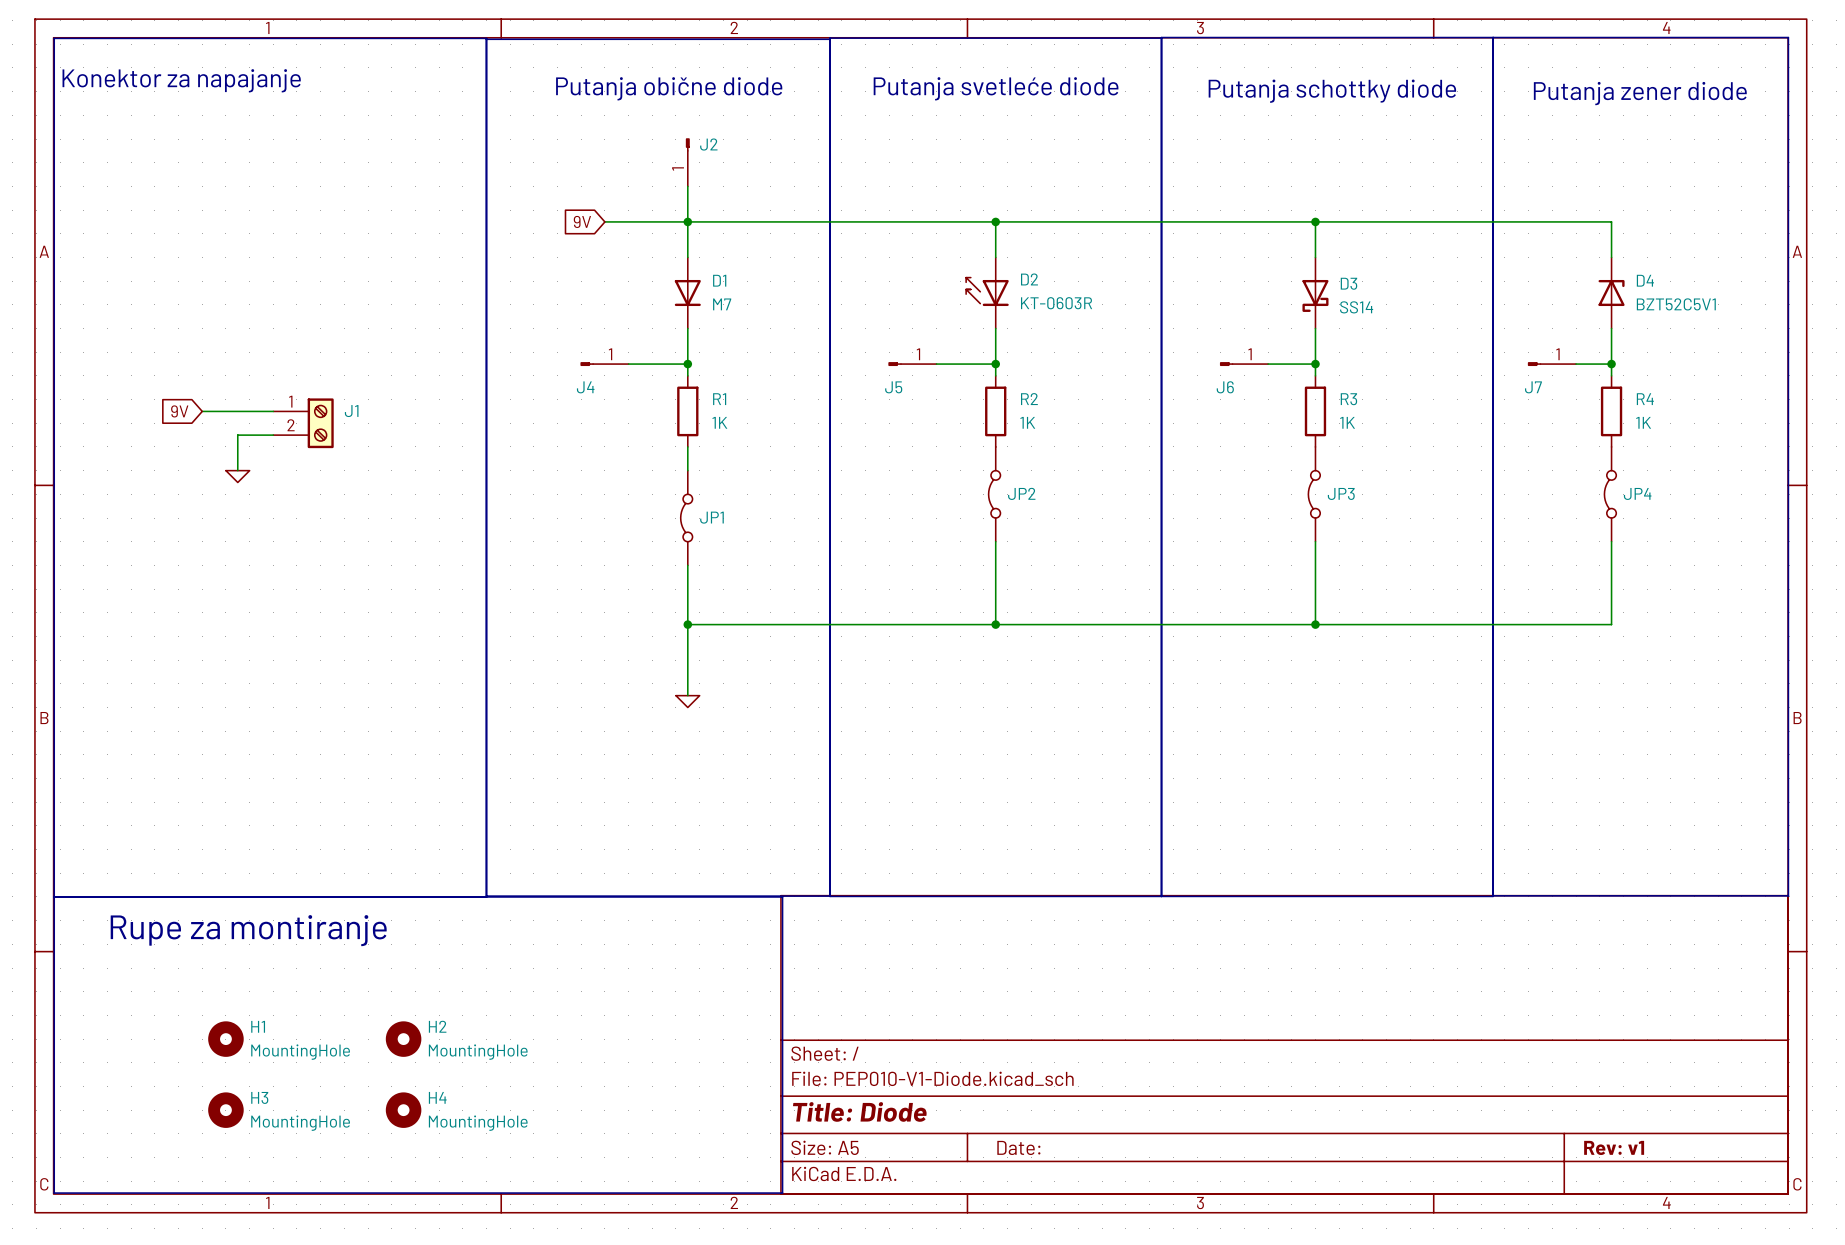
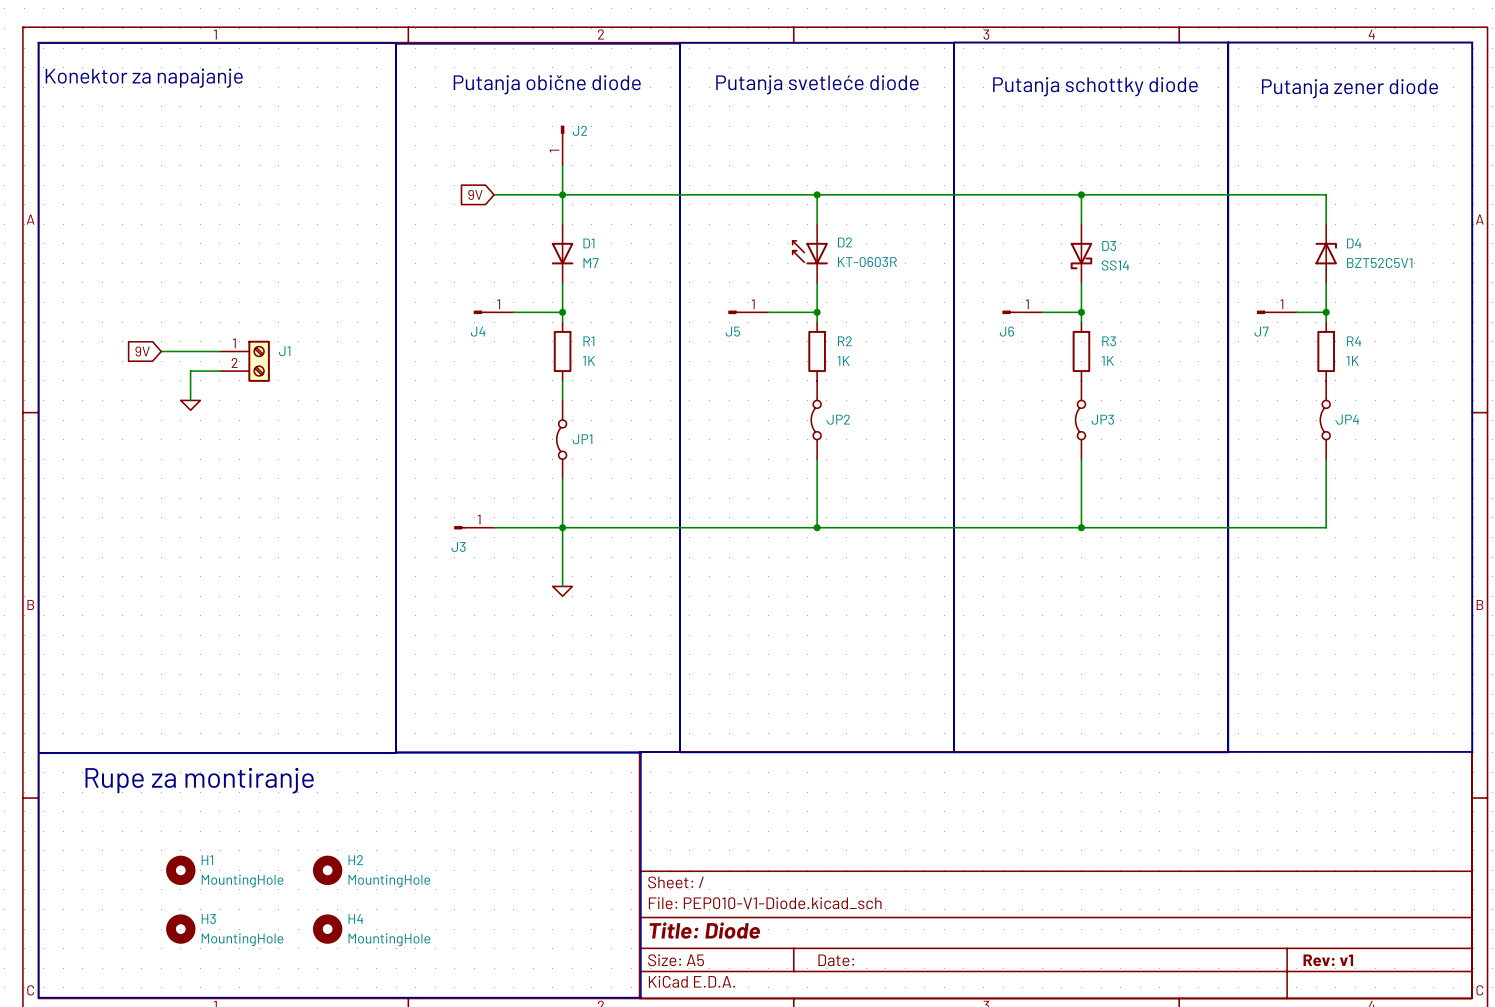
J3: none -> (474, 527)
wire: none -> (494, 527) (562, 527)

